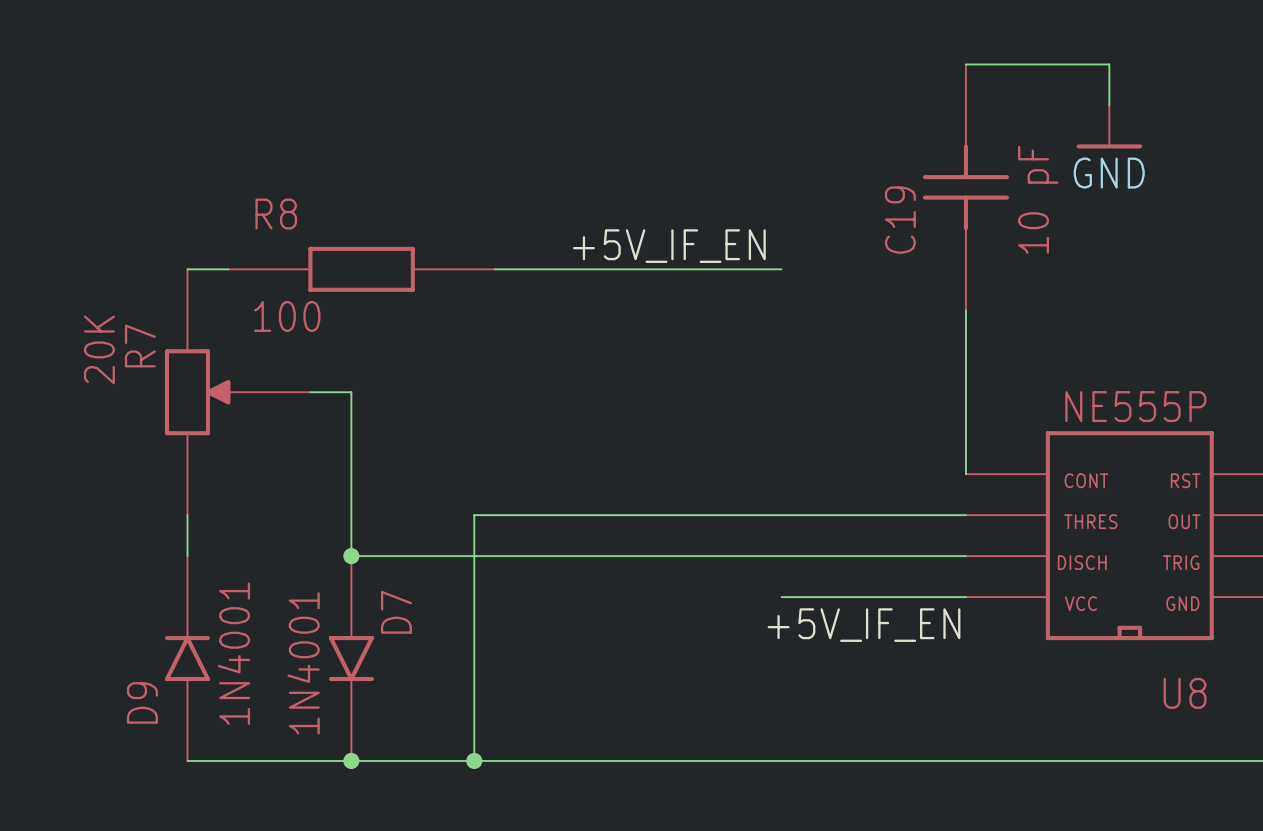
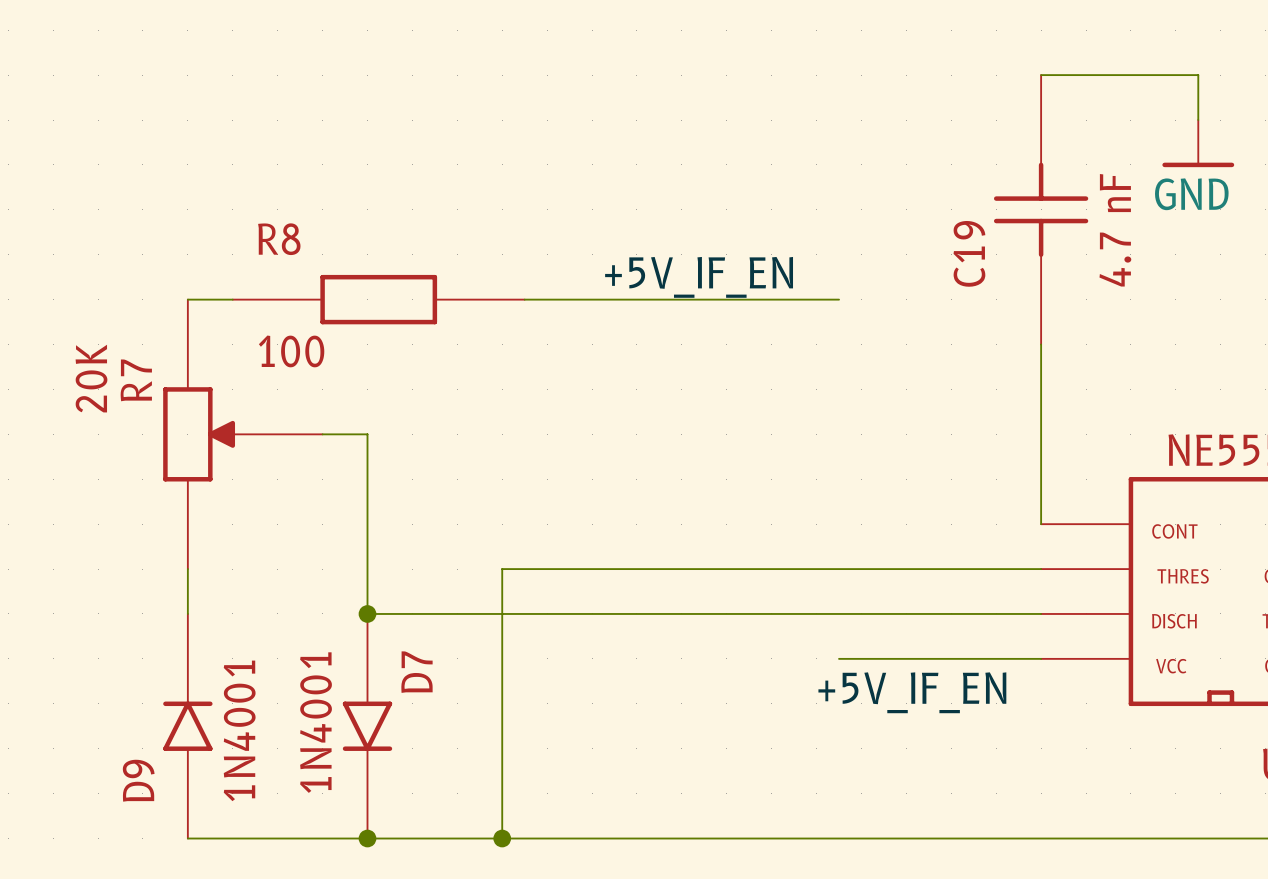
C19 value: 10 pF (1038, 199) -> 4.7 nF (1115, 230)

